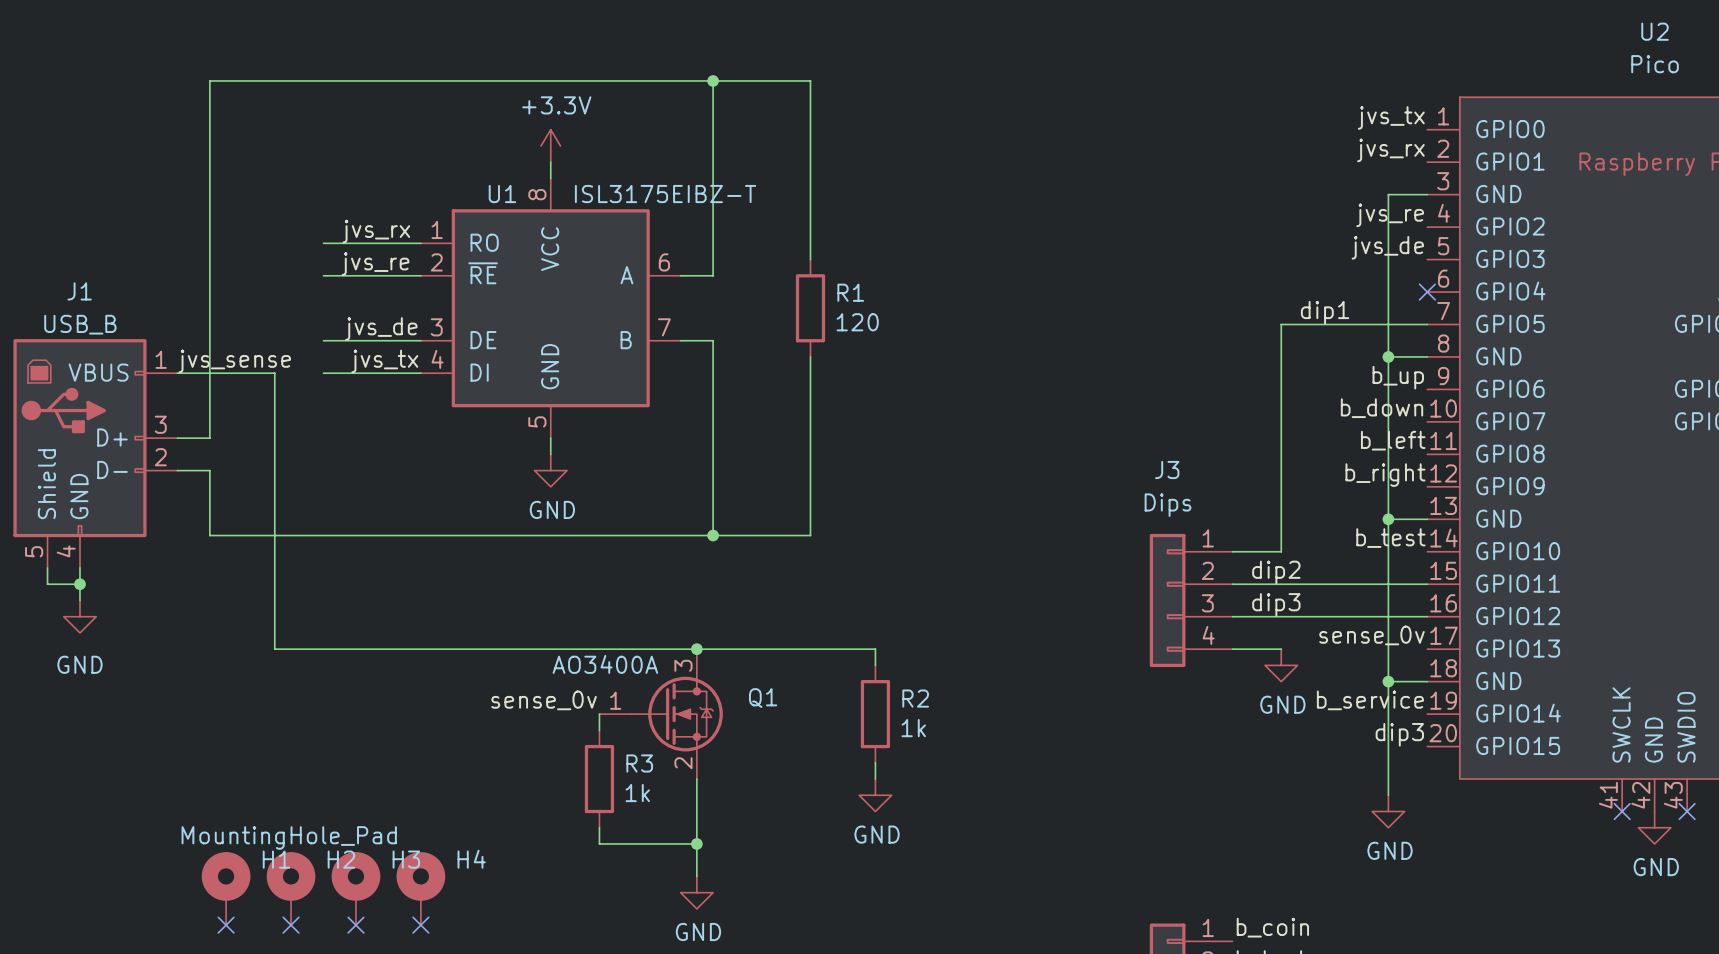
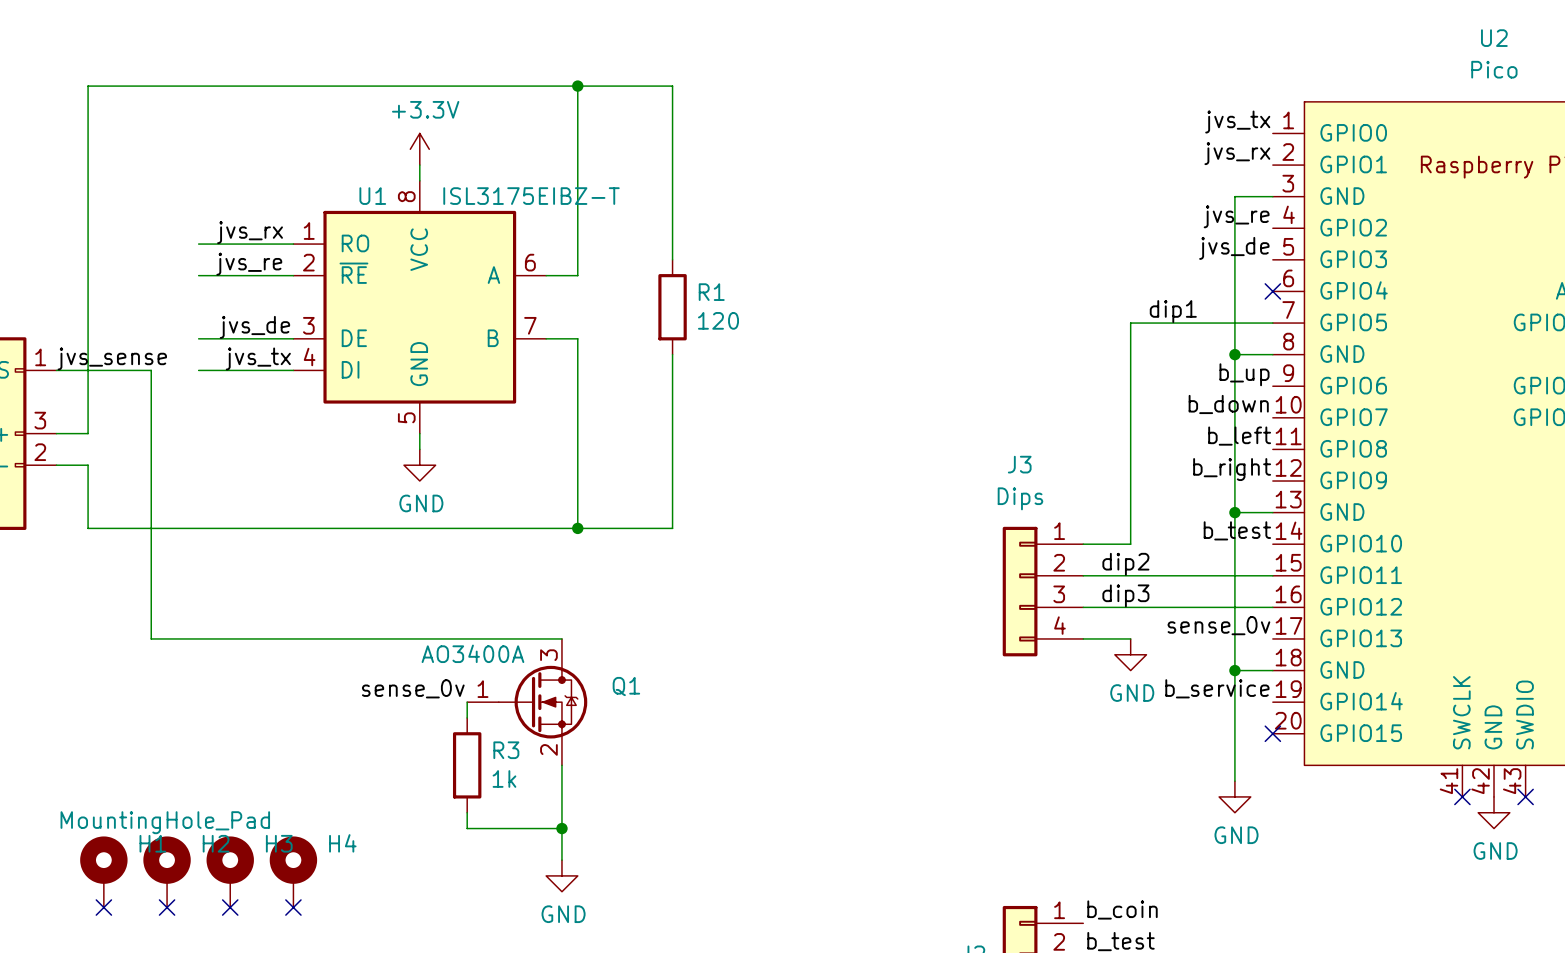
wire: (696, 649) (875, 649) (875, 665) -> none
junction: (696, 649) -> none
R2: 1k (875, 714) -> none
label: dip3 (1399, 734) -> none
no-connect mark: none -> (1272, 733)
wire: (875, 762) (875, 779) -> none
power symbol: GND (875, 795) -> none

